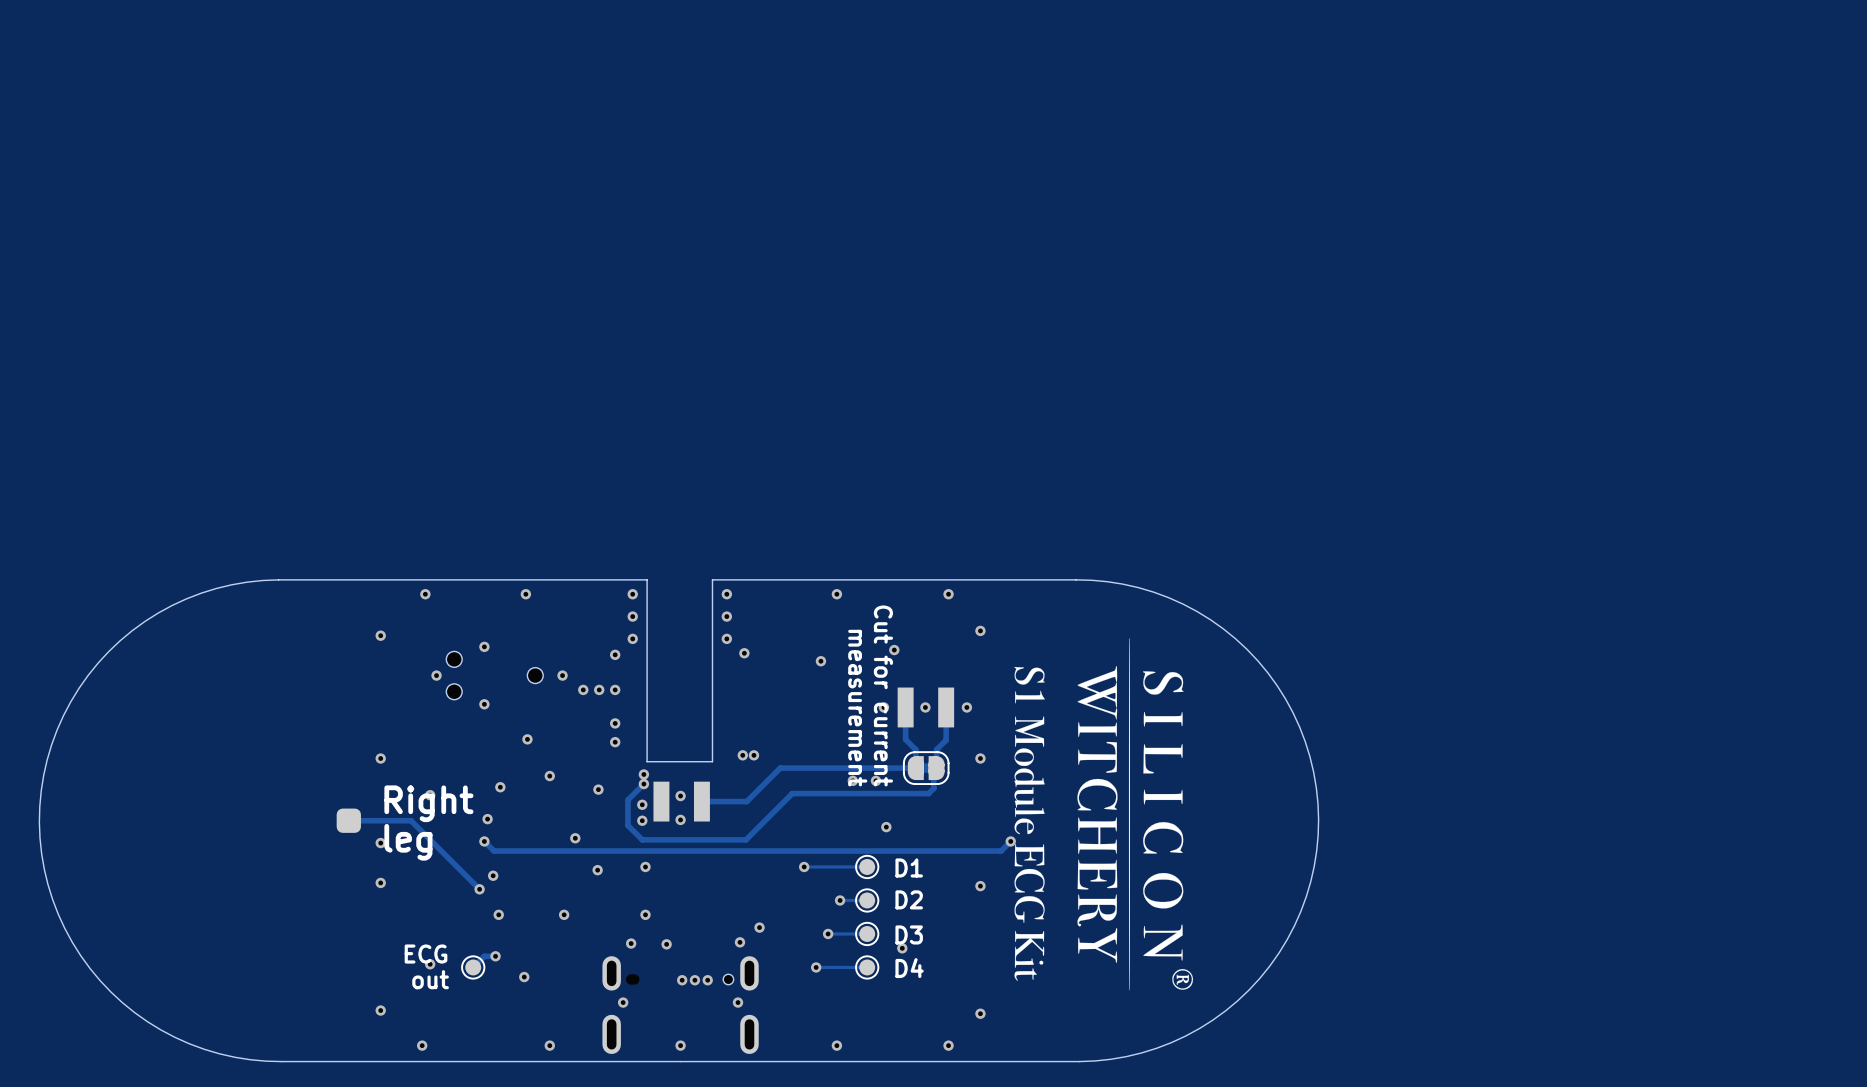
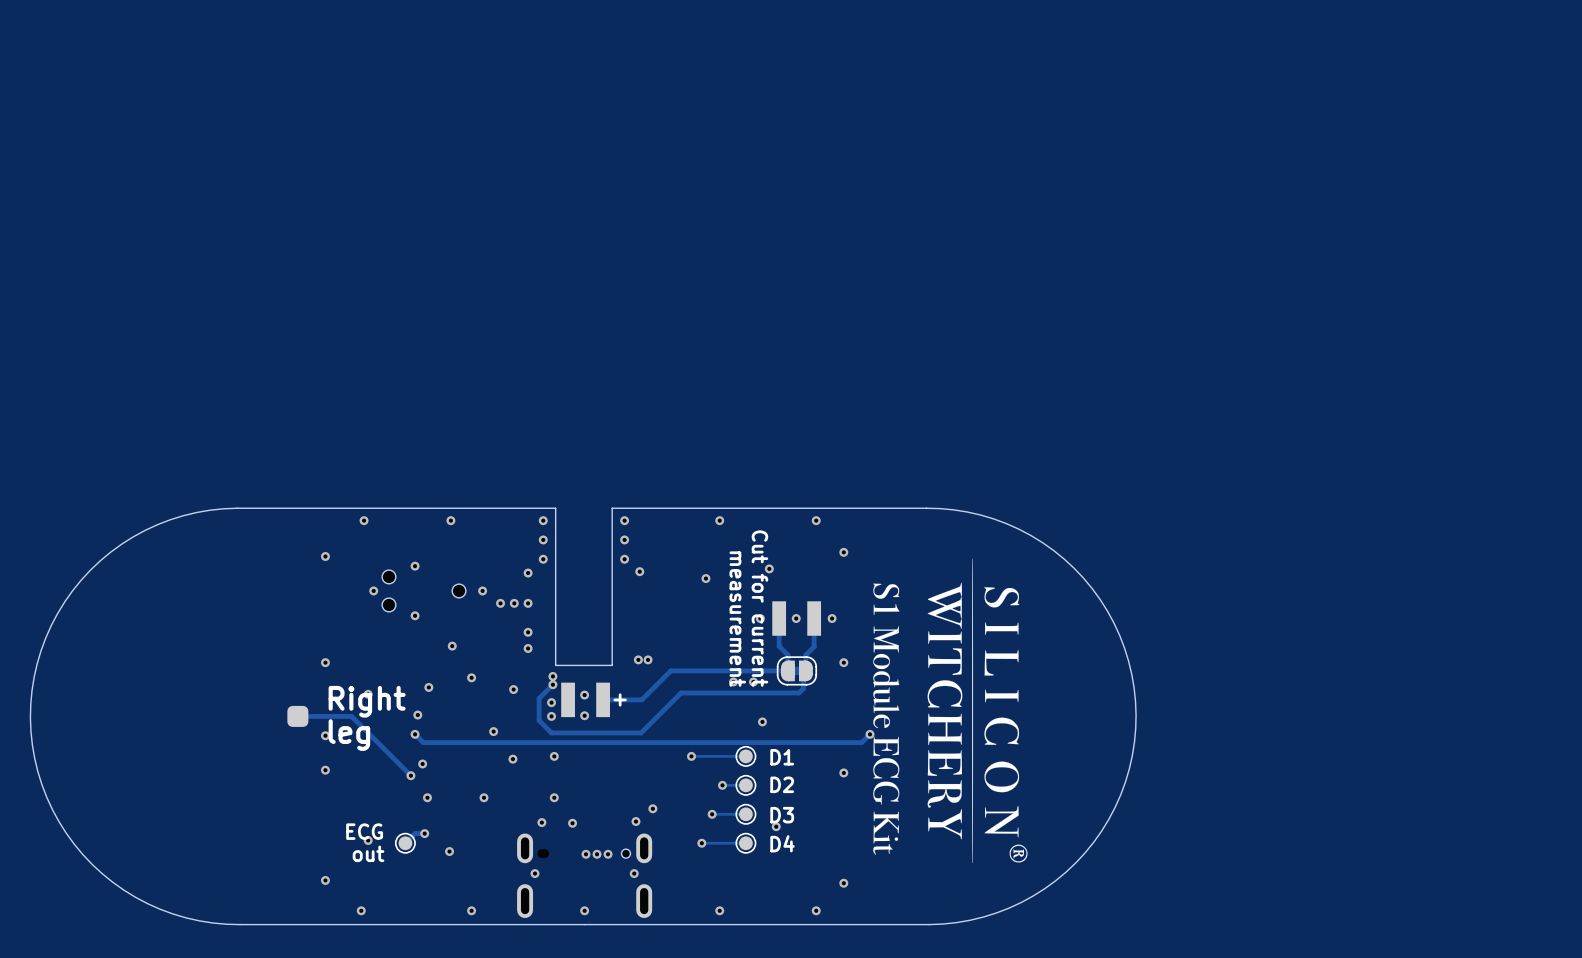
text: none -> + (620, 699)

